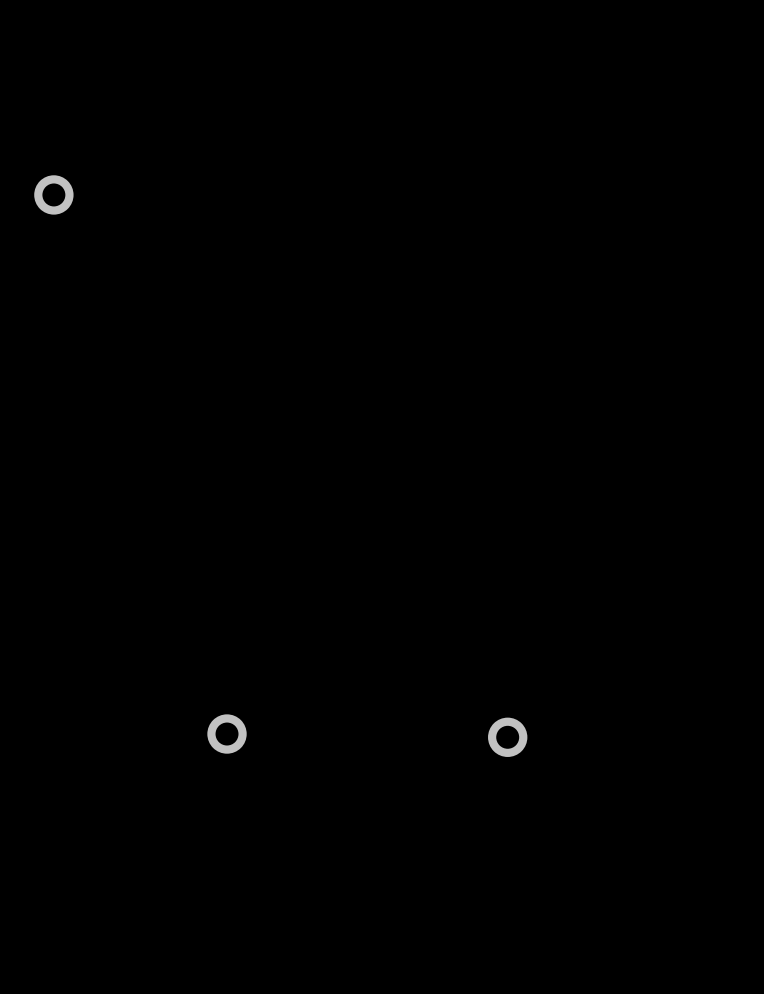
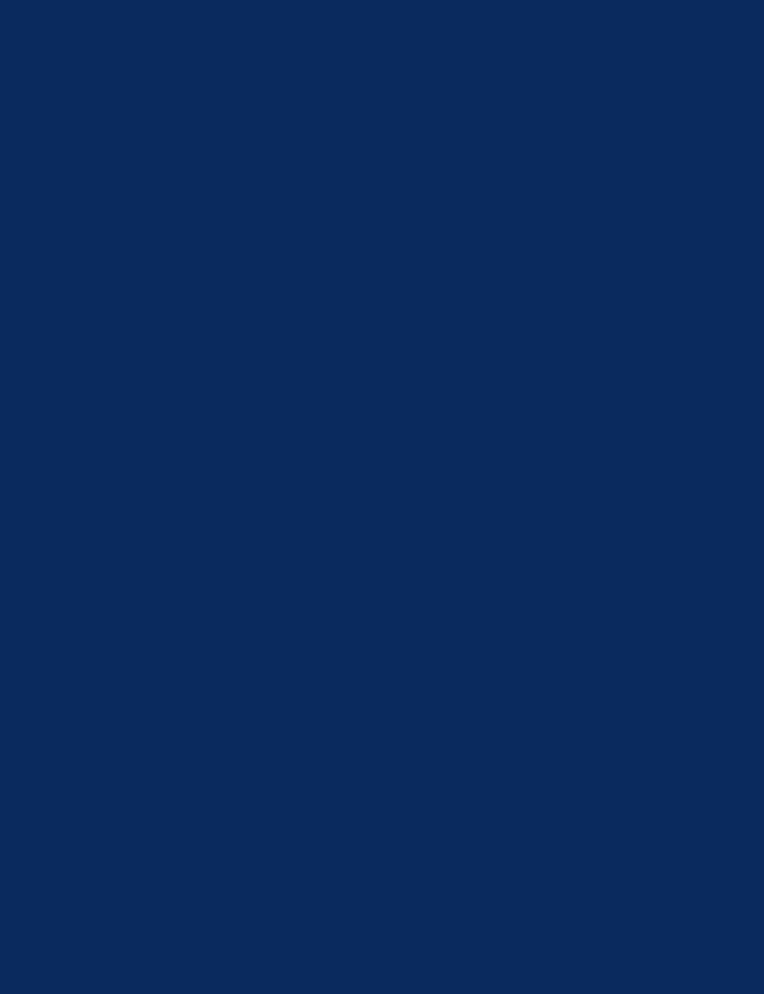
via: (53, 194) -> none
via: (227, 734) -> none
via: (507, 737) -> none

